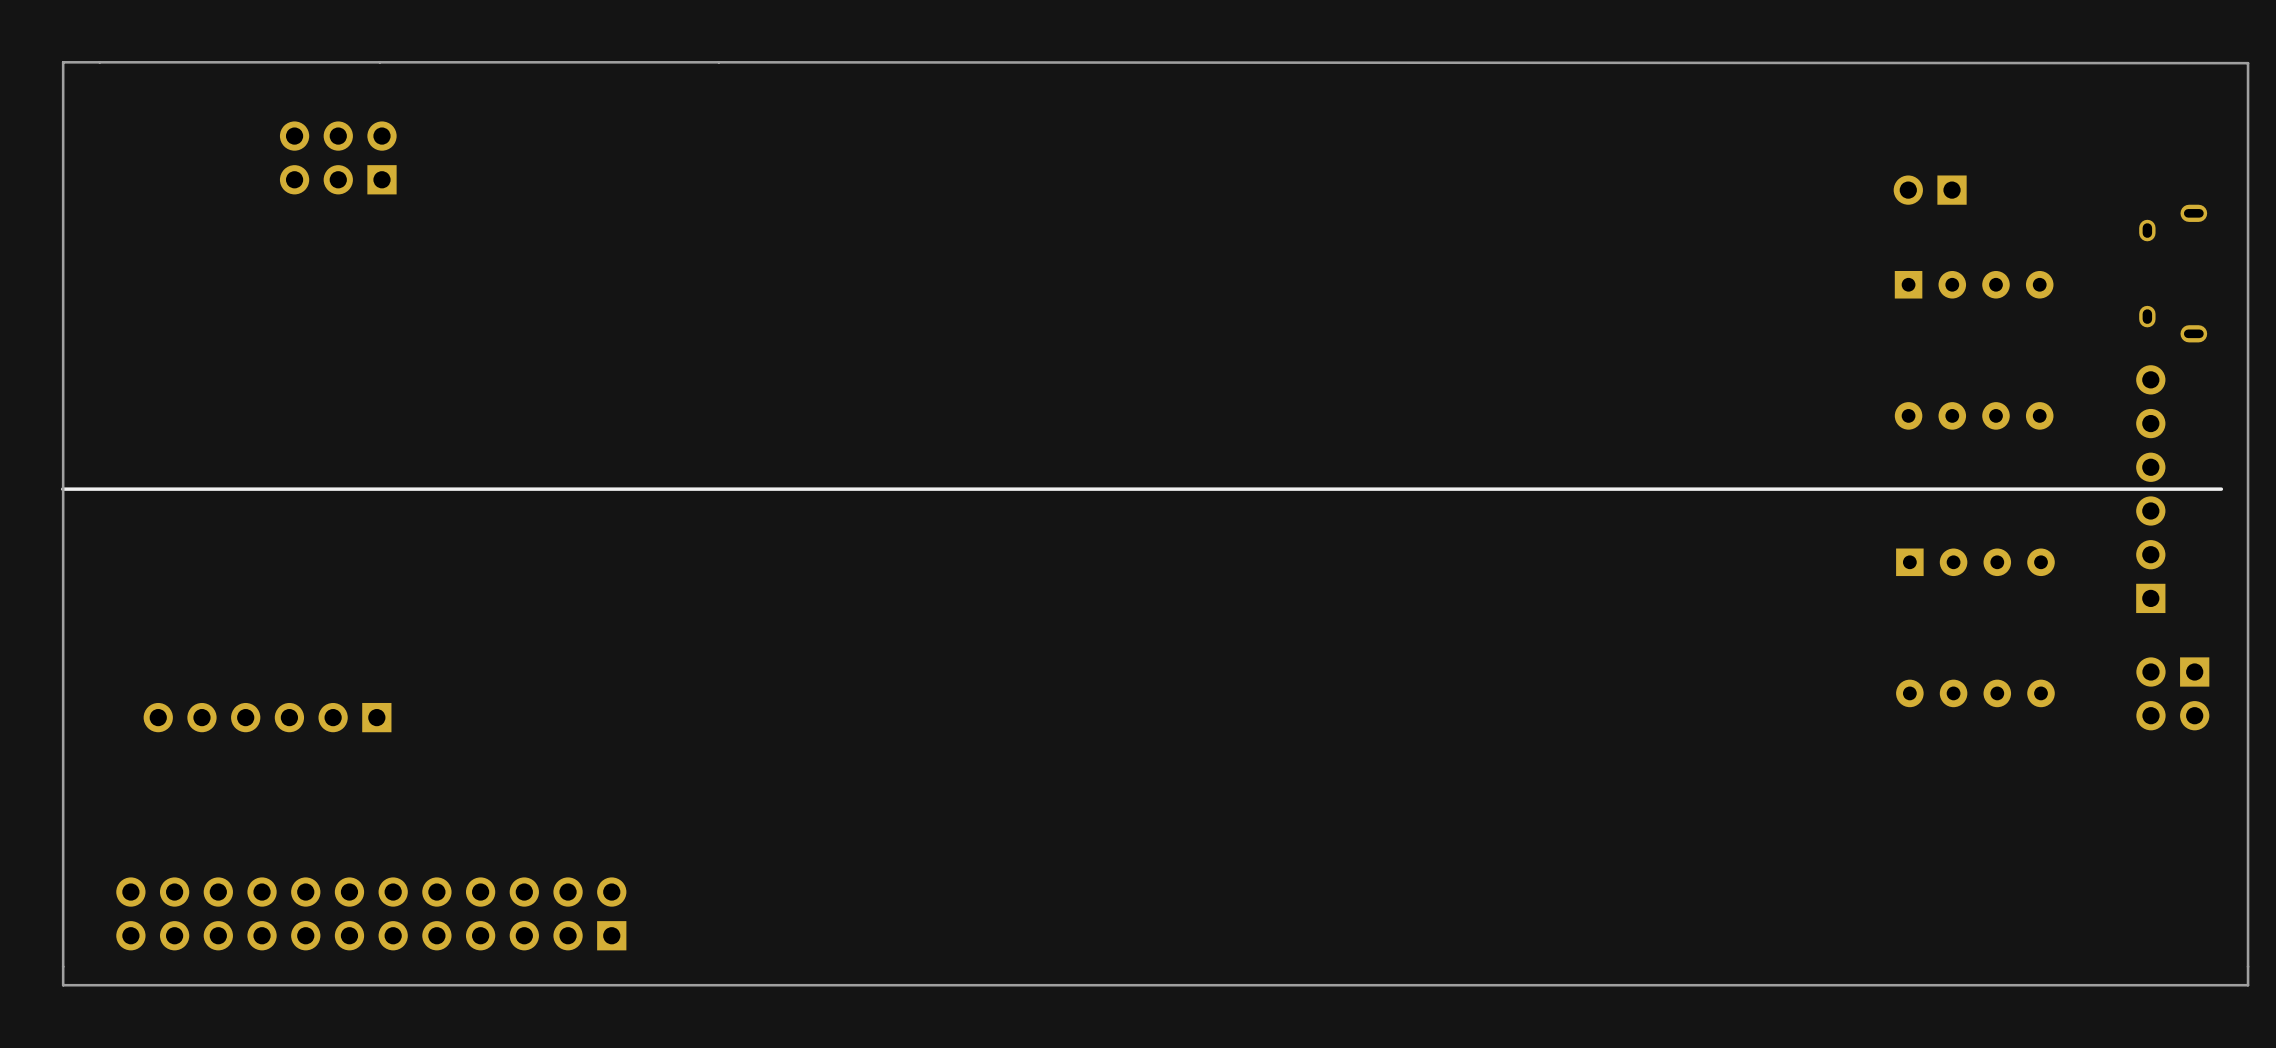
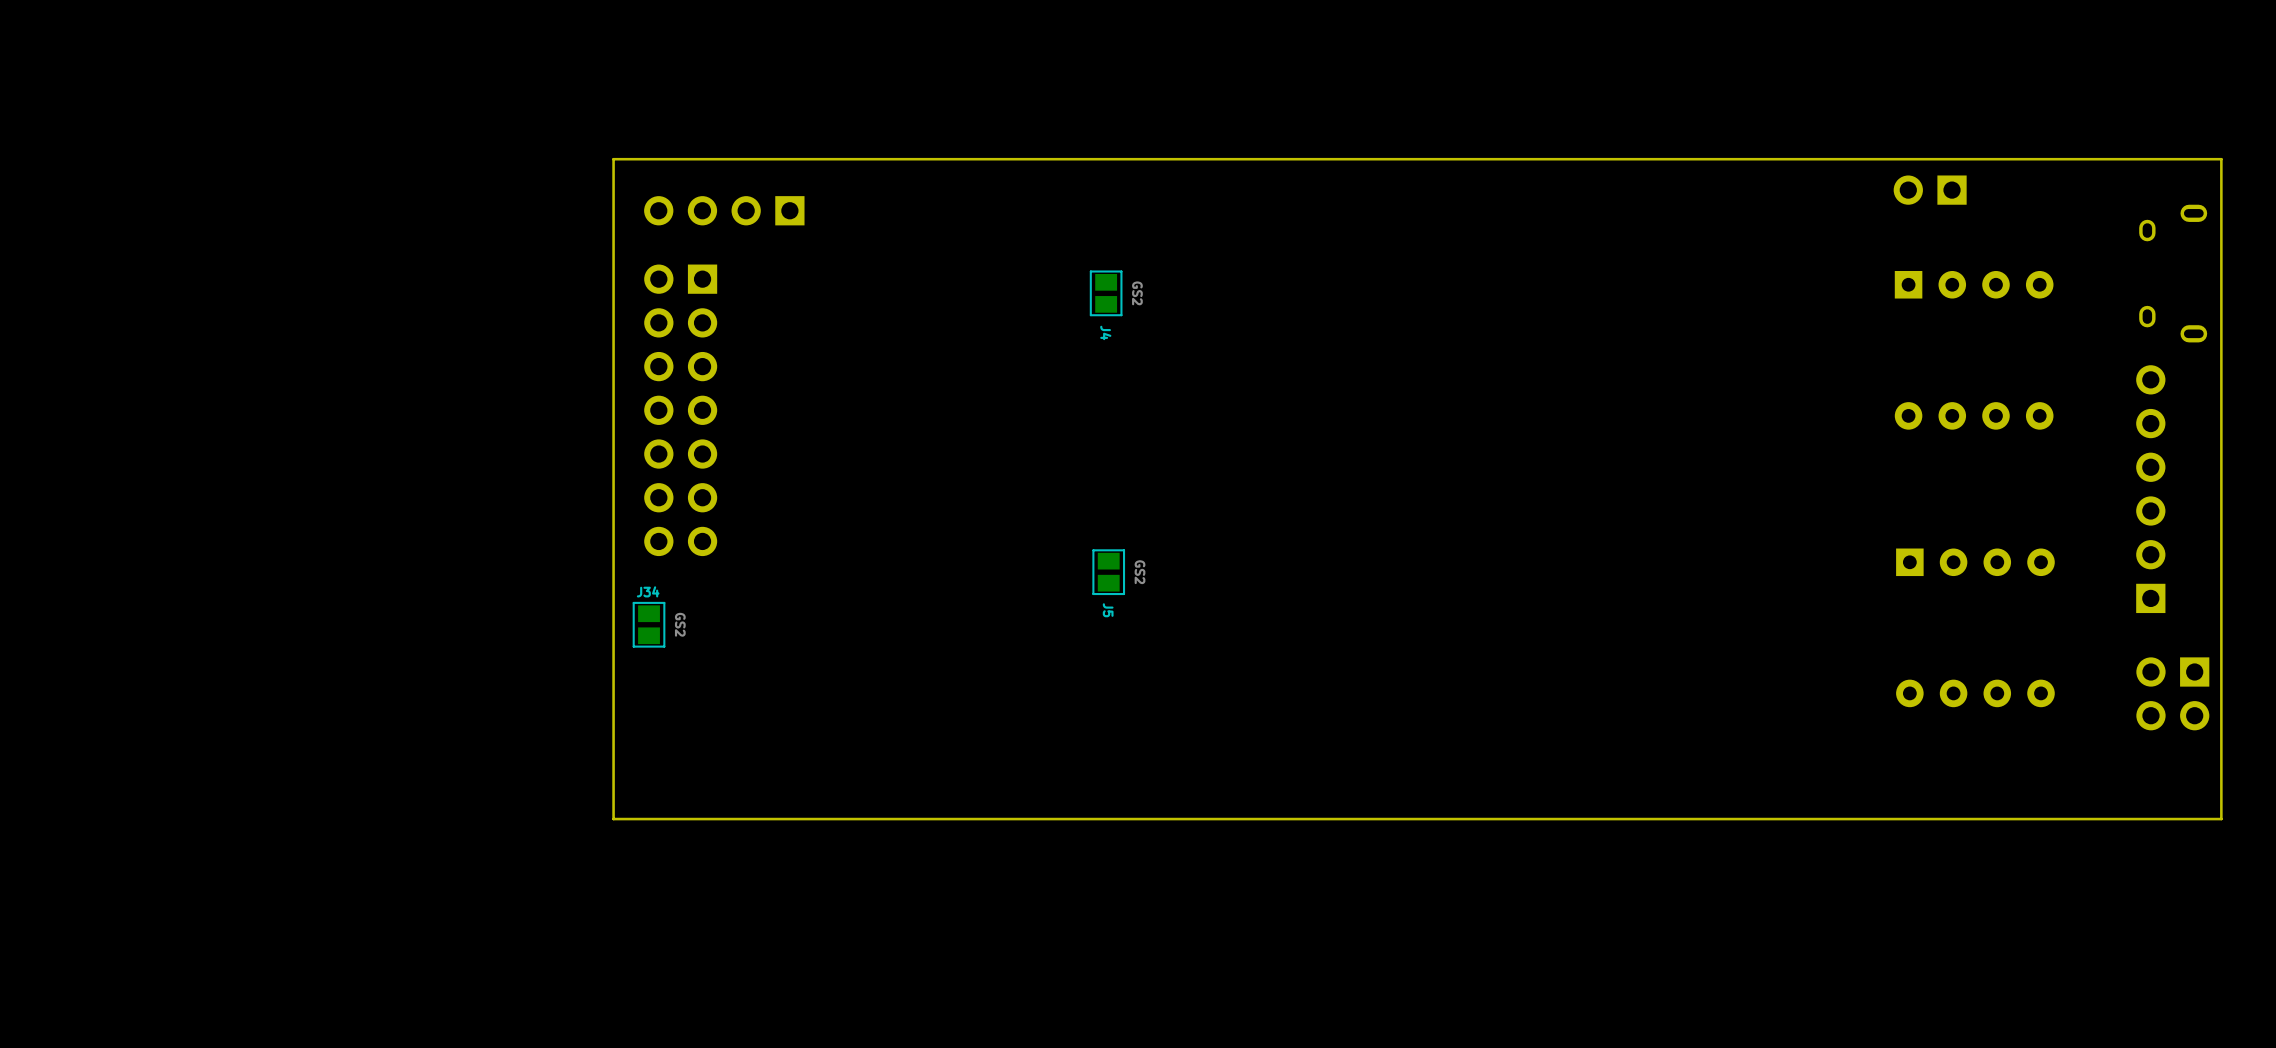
board edge: (718, 62) (63, 62) (63, 985) (2248, 985) (2248, 63) (718, 62) -> (2221, 159) (2221, 819) (613, 819) (613, 159) (2221, 159)
part: (338, 157) -> none
part: none -> (724, 210)
J4: none -> GS2 (1106, 293)
part: none -> (680, 410)
line: (2221, 489) (62, 489) -> none
J5: none -> GS2 (1108, 572)
J34: none -> GS2 (649, 624)
part: (267, 717) -> none
part: (371, 913) -> none

